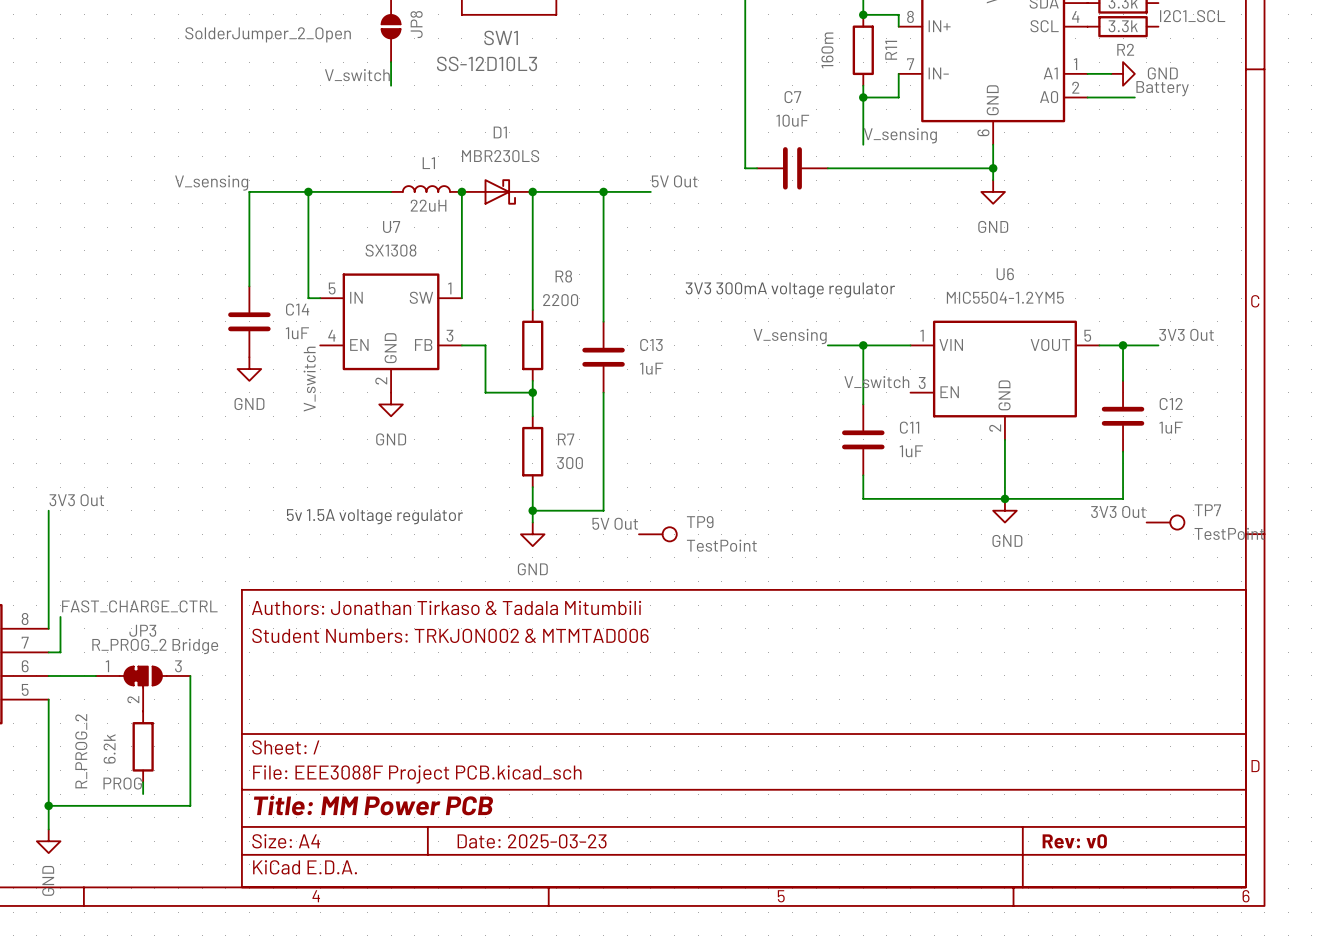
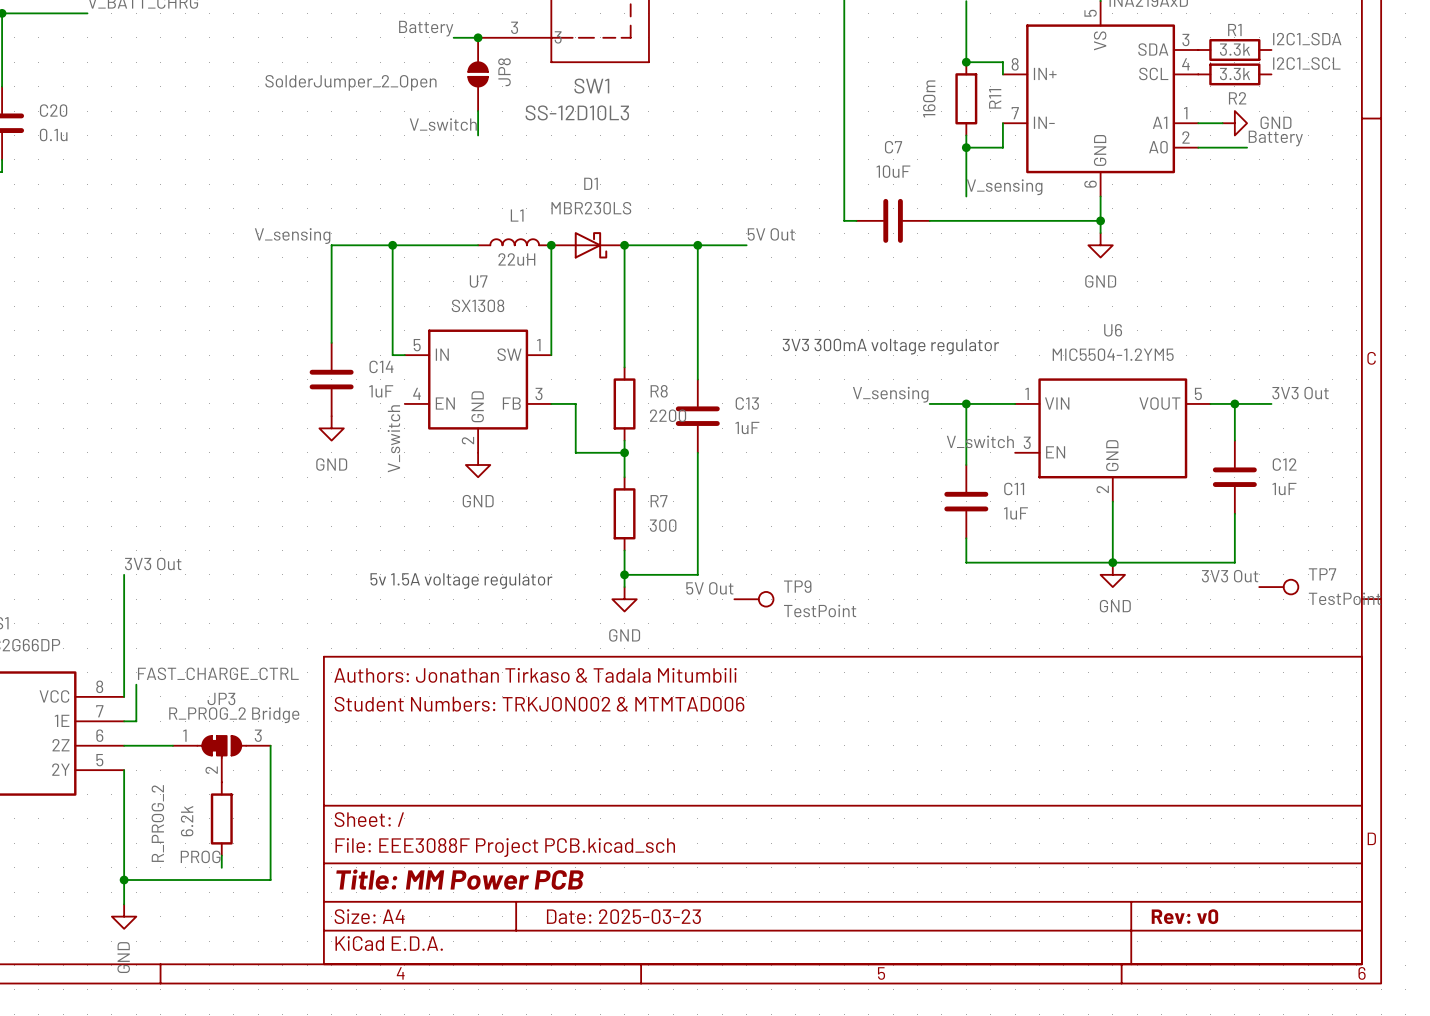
R8 name position: R8 (563, 276) -> R8 (659, 391)
R8 value position: 2200 (560, 300) -> 2200 (668, 415)

